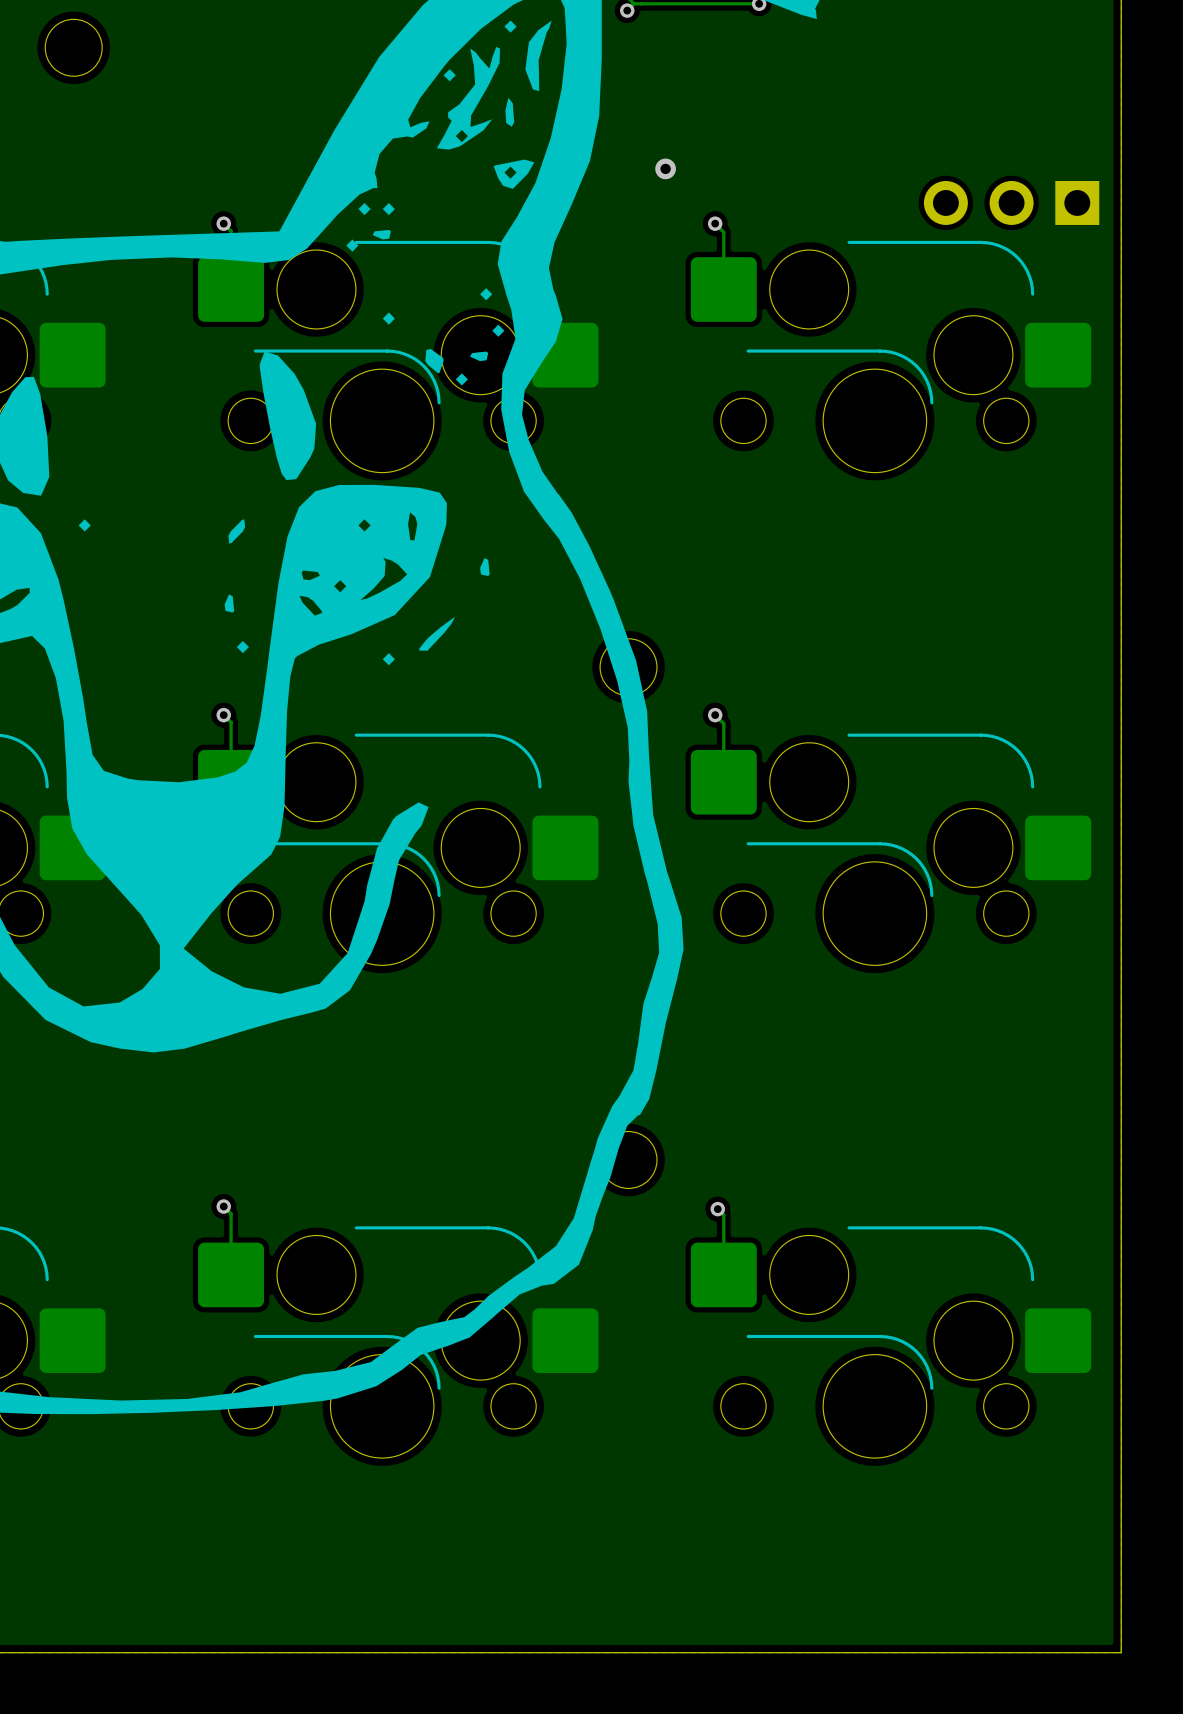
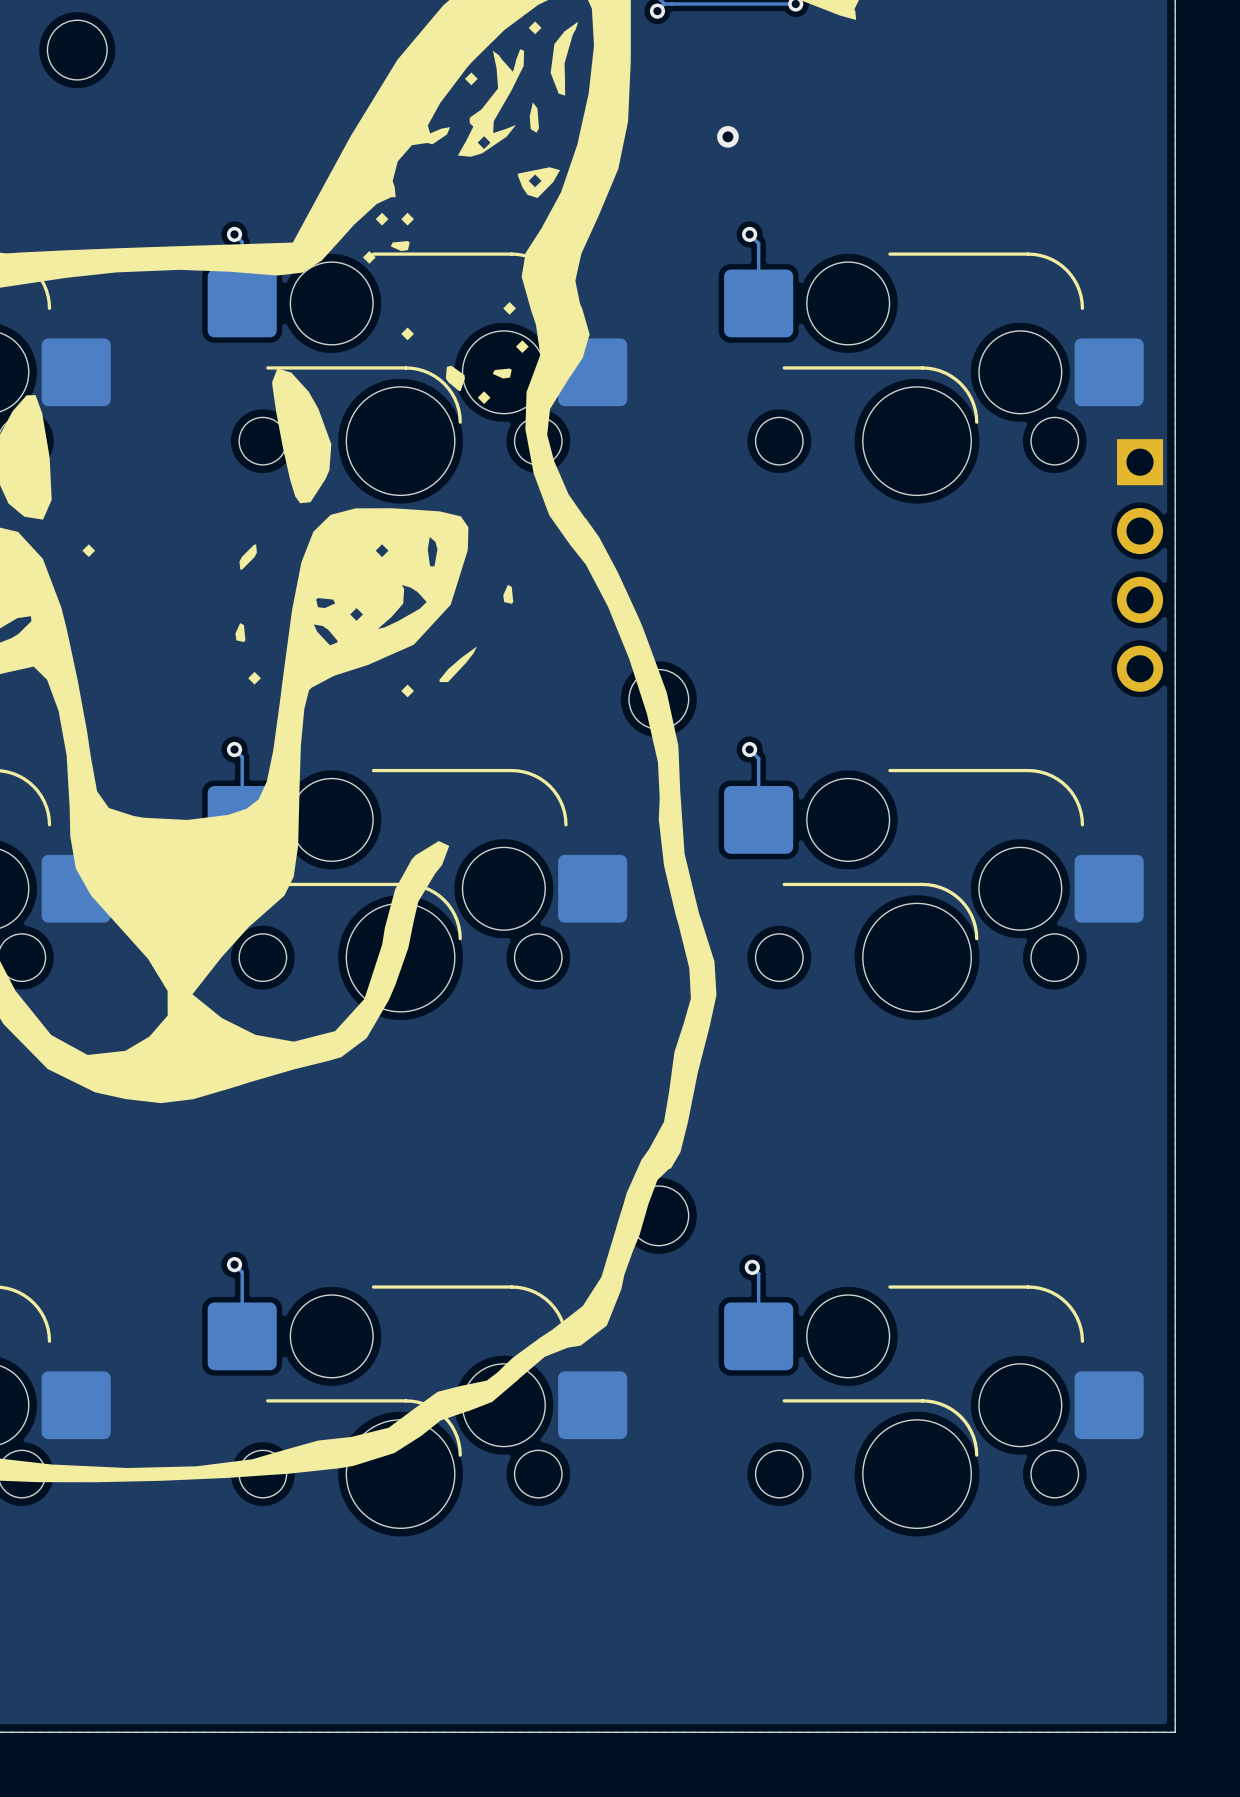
via position: (665, 168) -> (727, 136)
part: (1011, 202) -> none
part: none -> (1140, 565)

